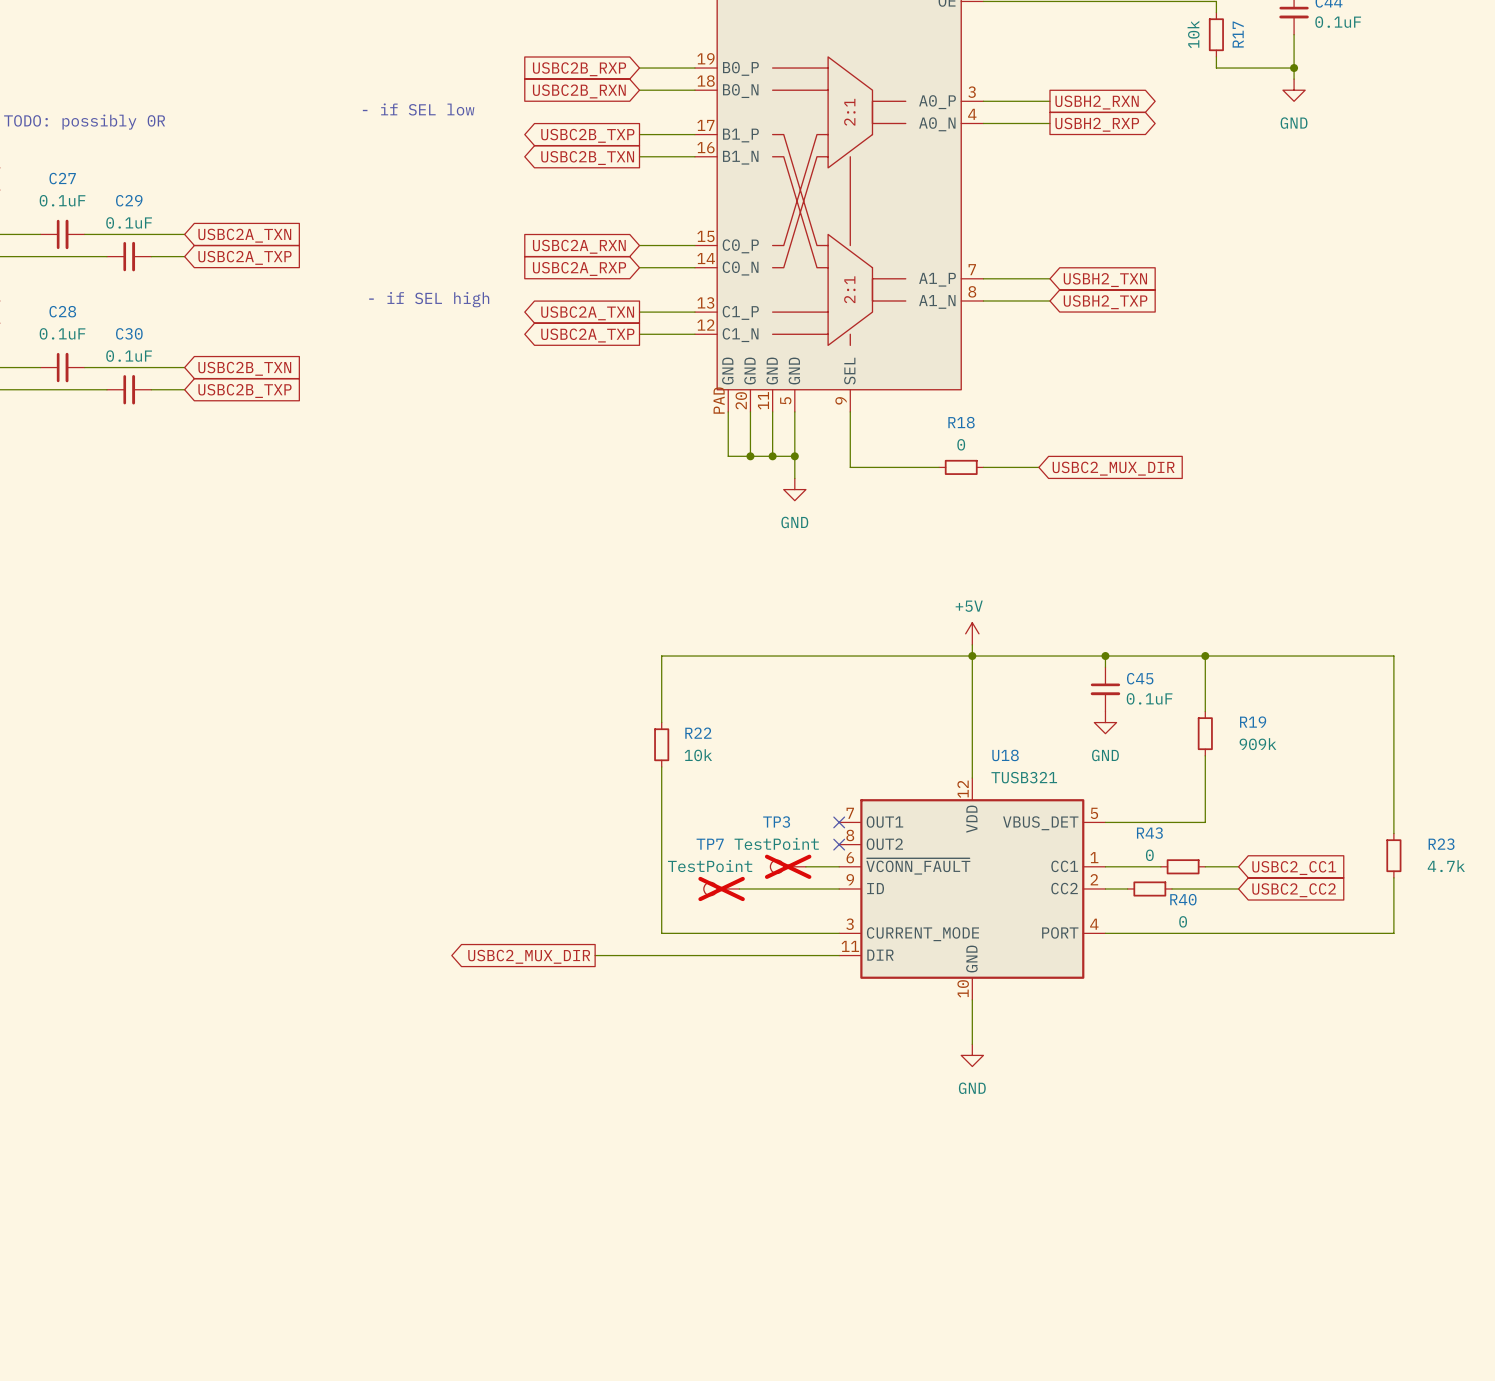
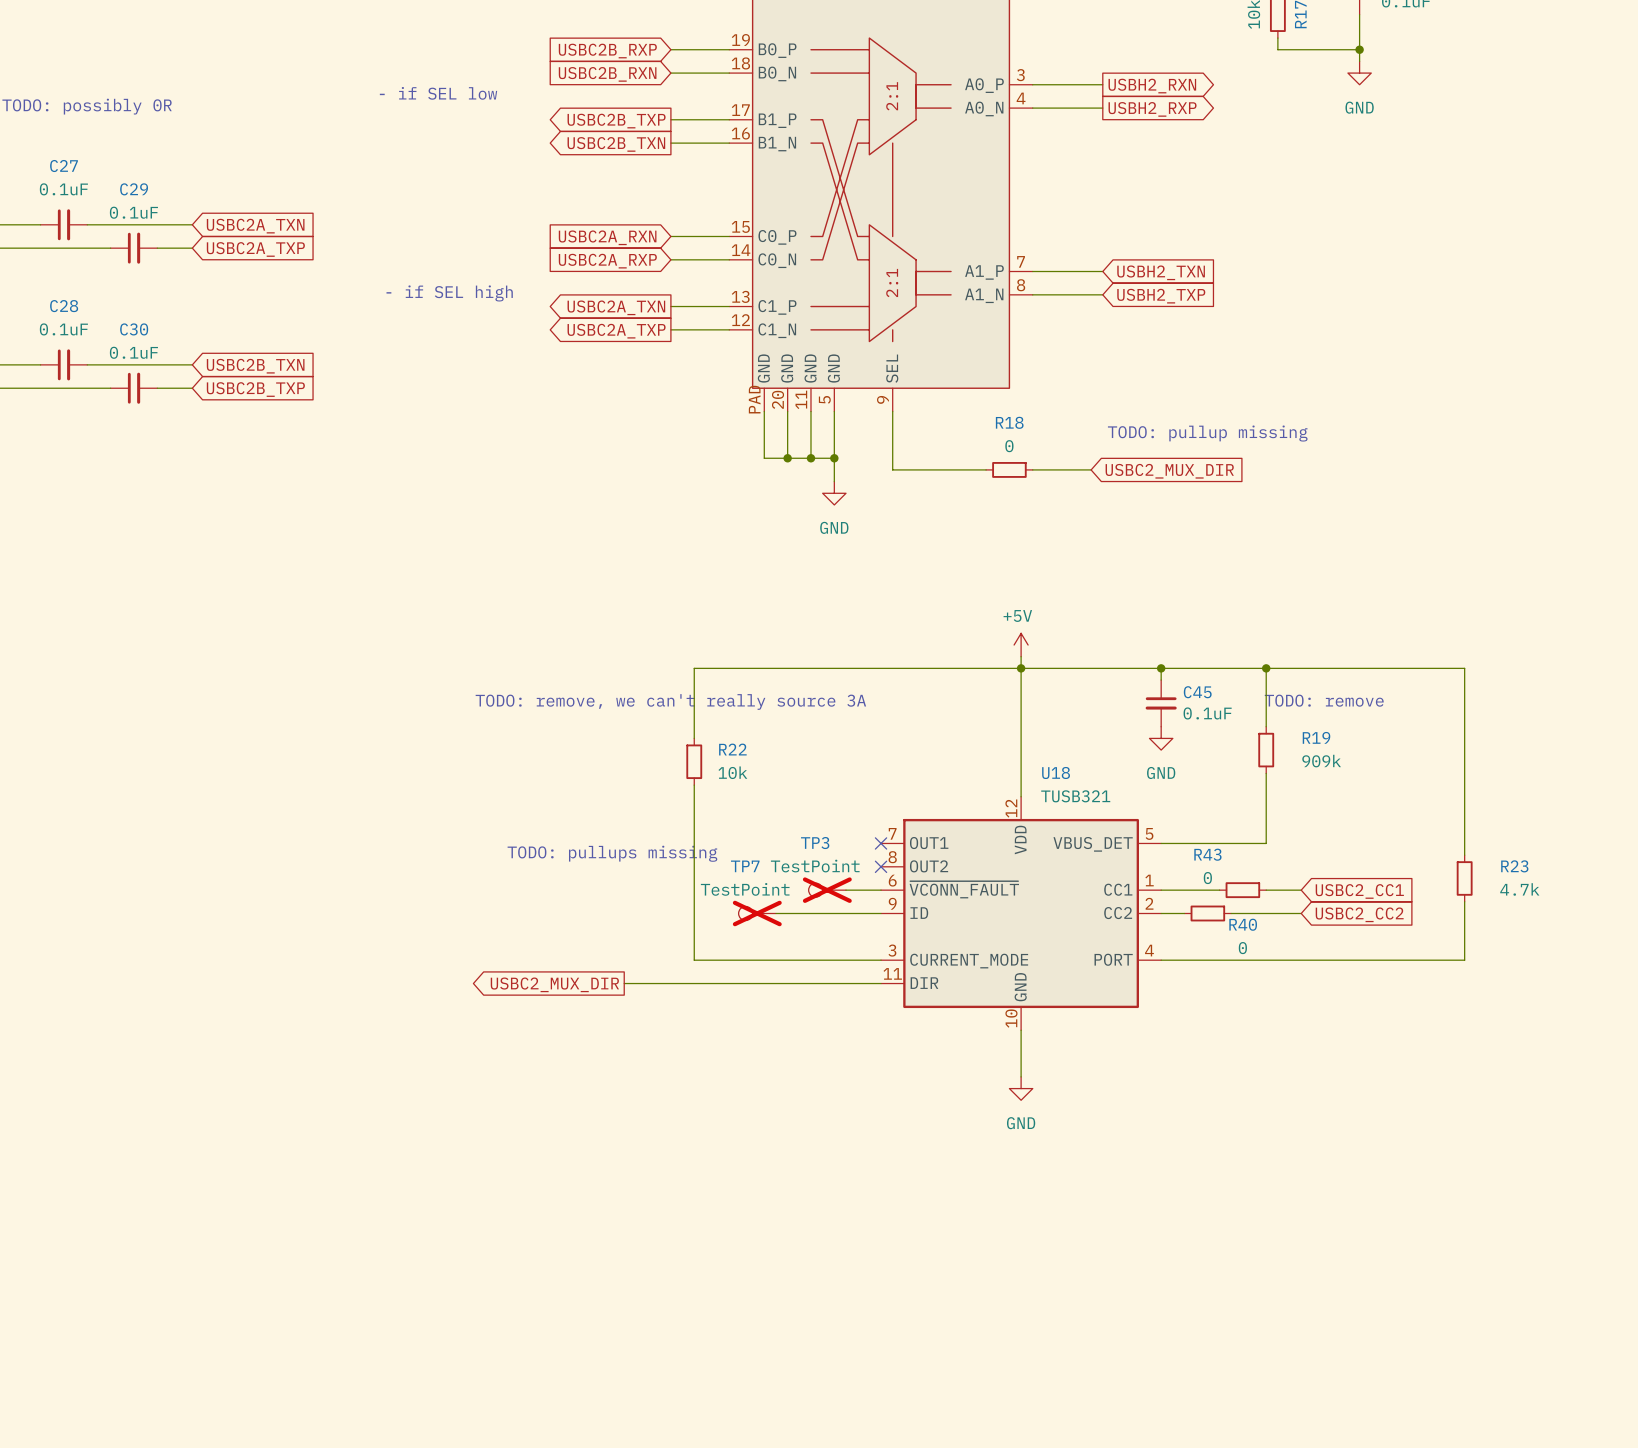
text: none -> TODO: pullup missing (1207, 433)
text: none -> TODO: remove (1324, 700)
text: none -> TODO: remove, we can't really source 3A (670, 701)
text: none -> TODO: pullups missing (612, 853)

